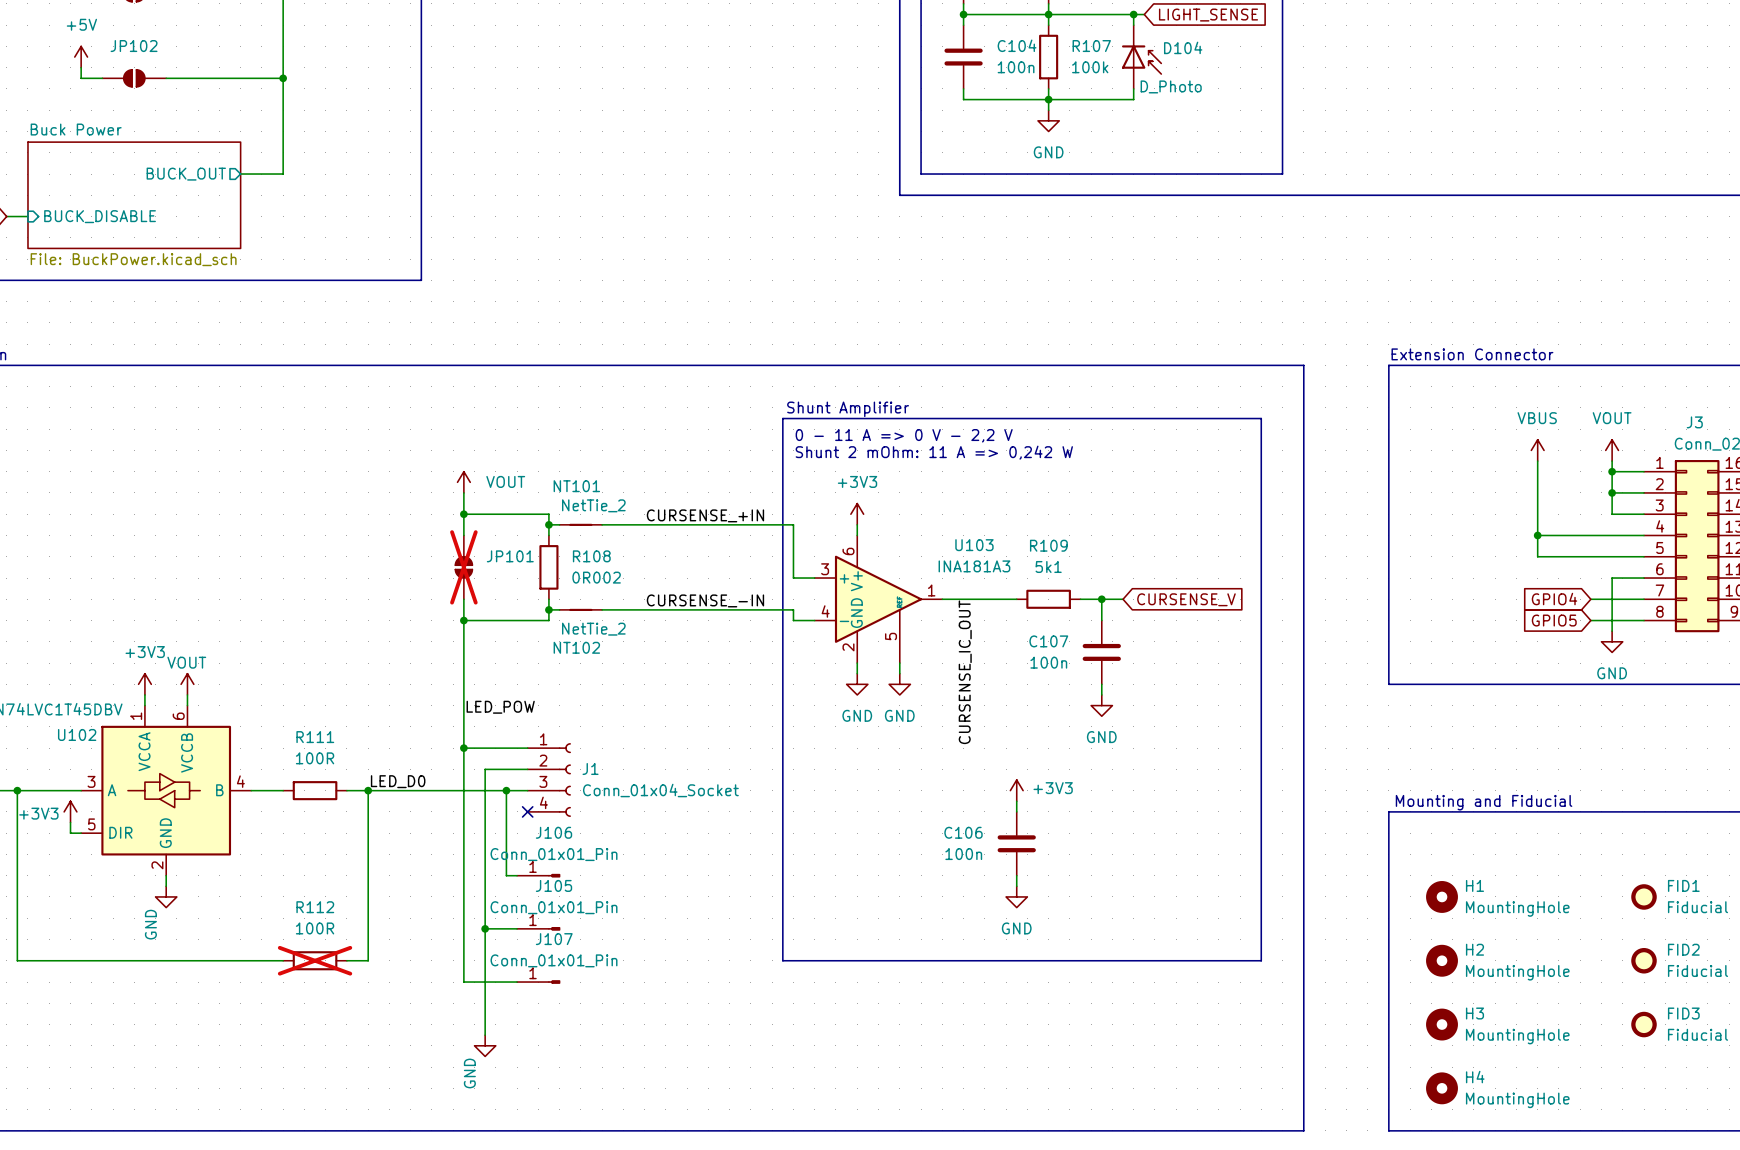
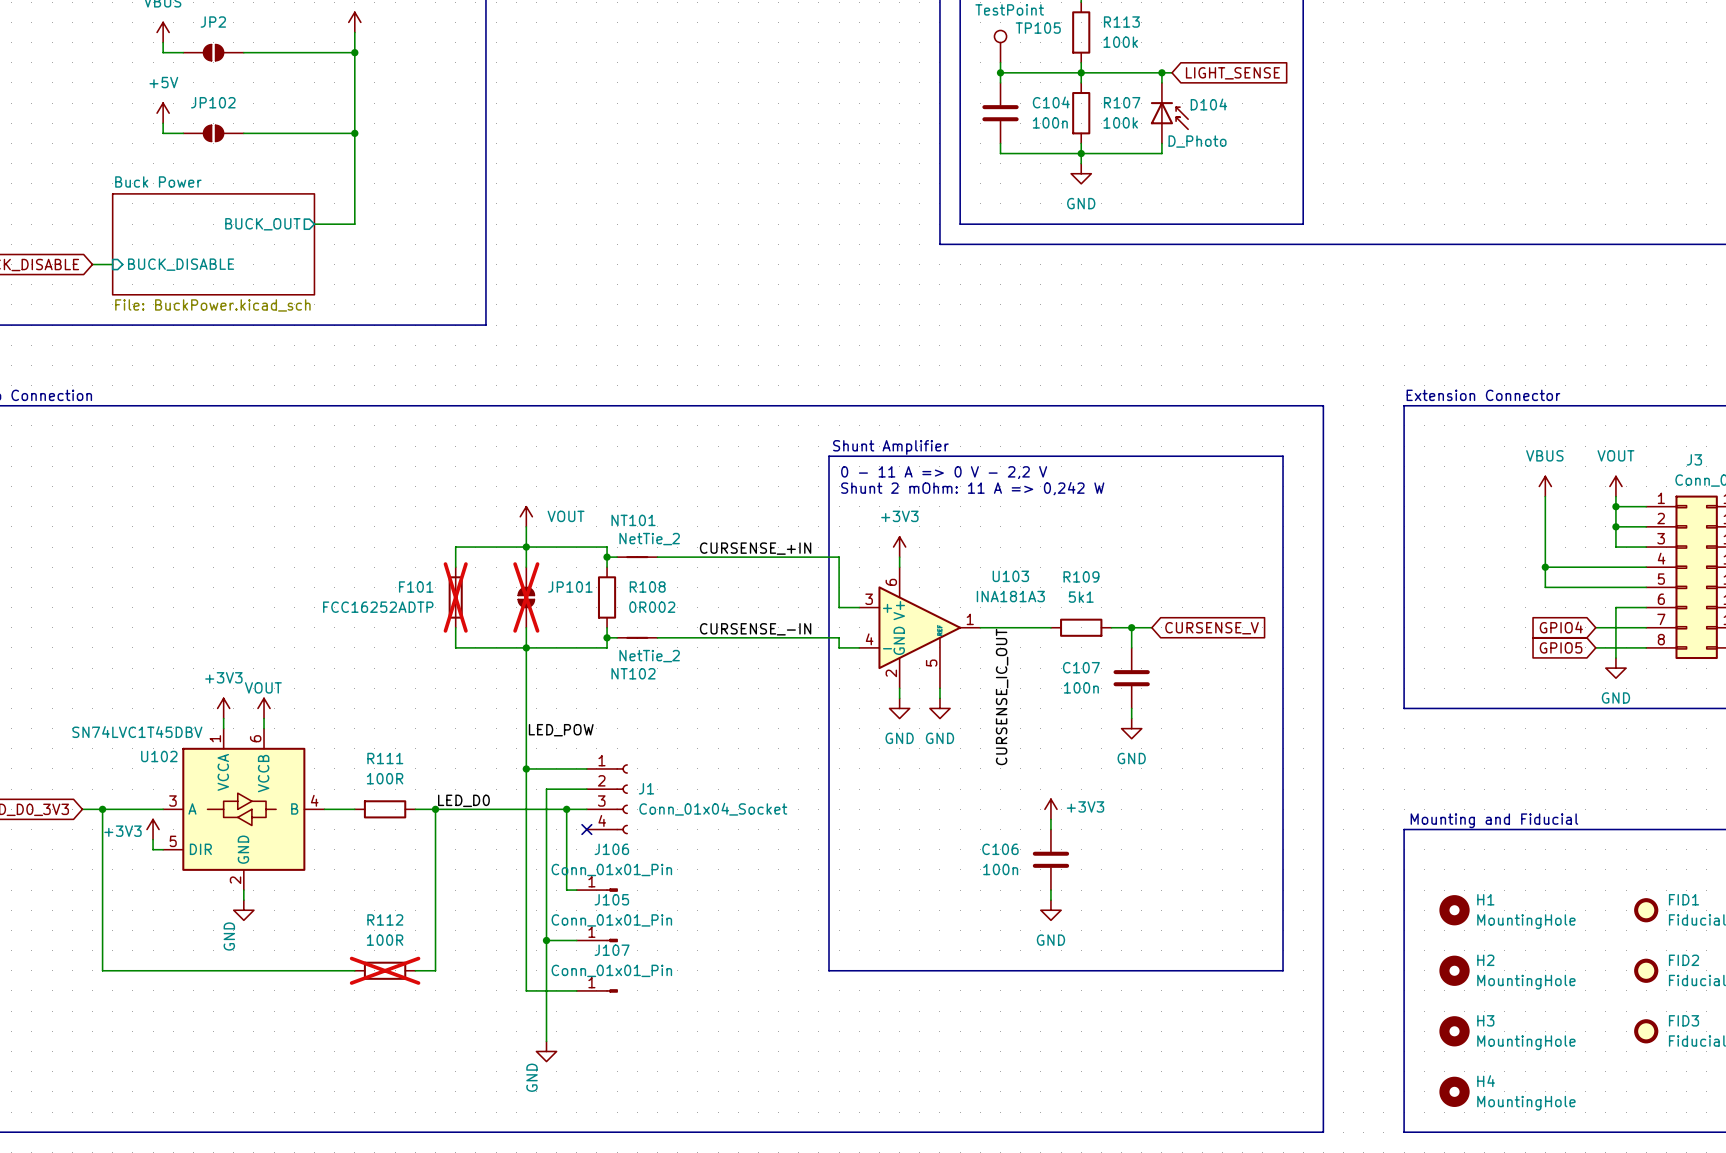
wire: none -> (526, 547) (455, 547) (455, 567)
F101: none -> FCC16252ADTP (455, 597)
wire: none -> (455, 627) (455, 647) (526, 647)

